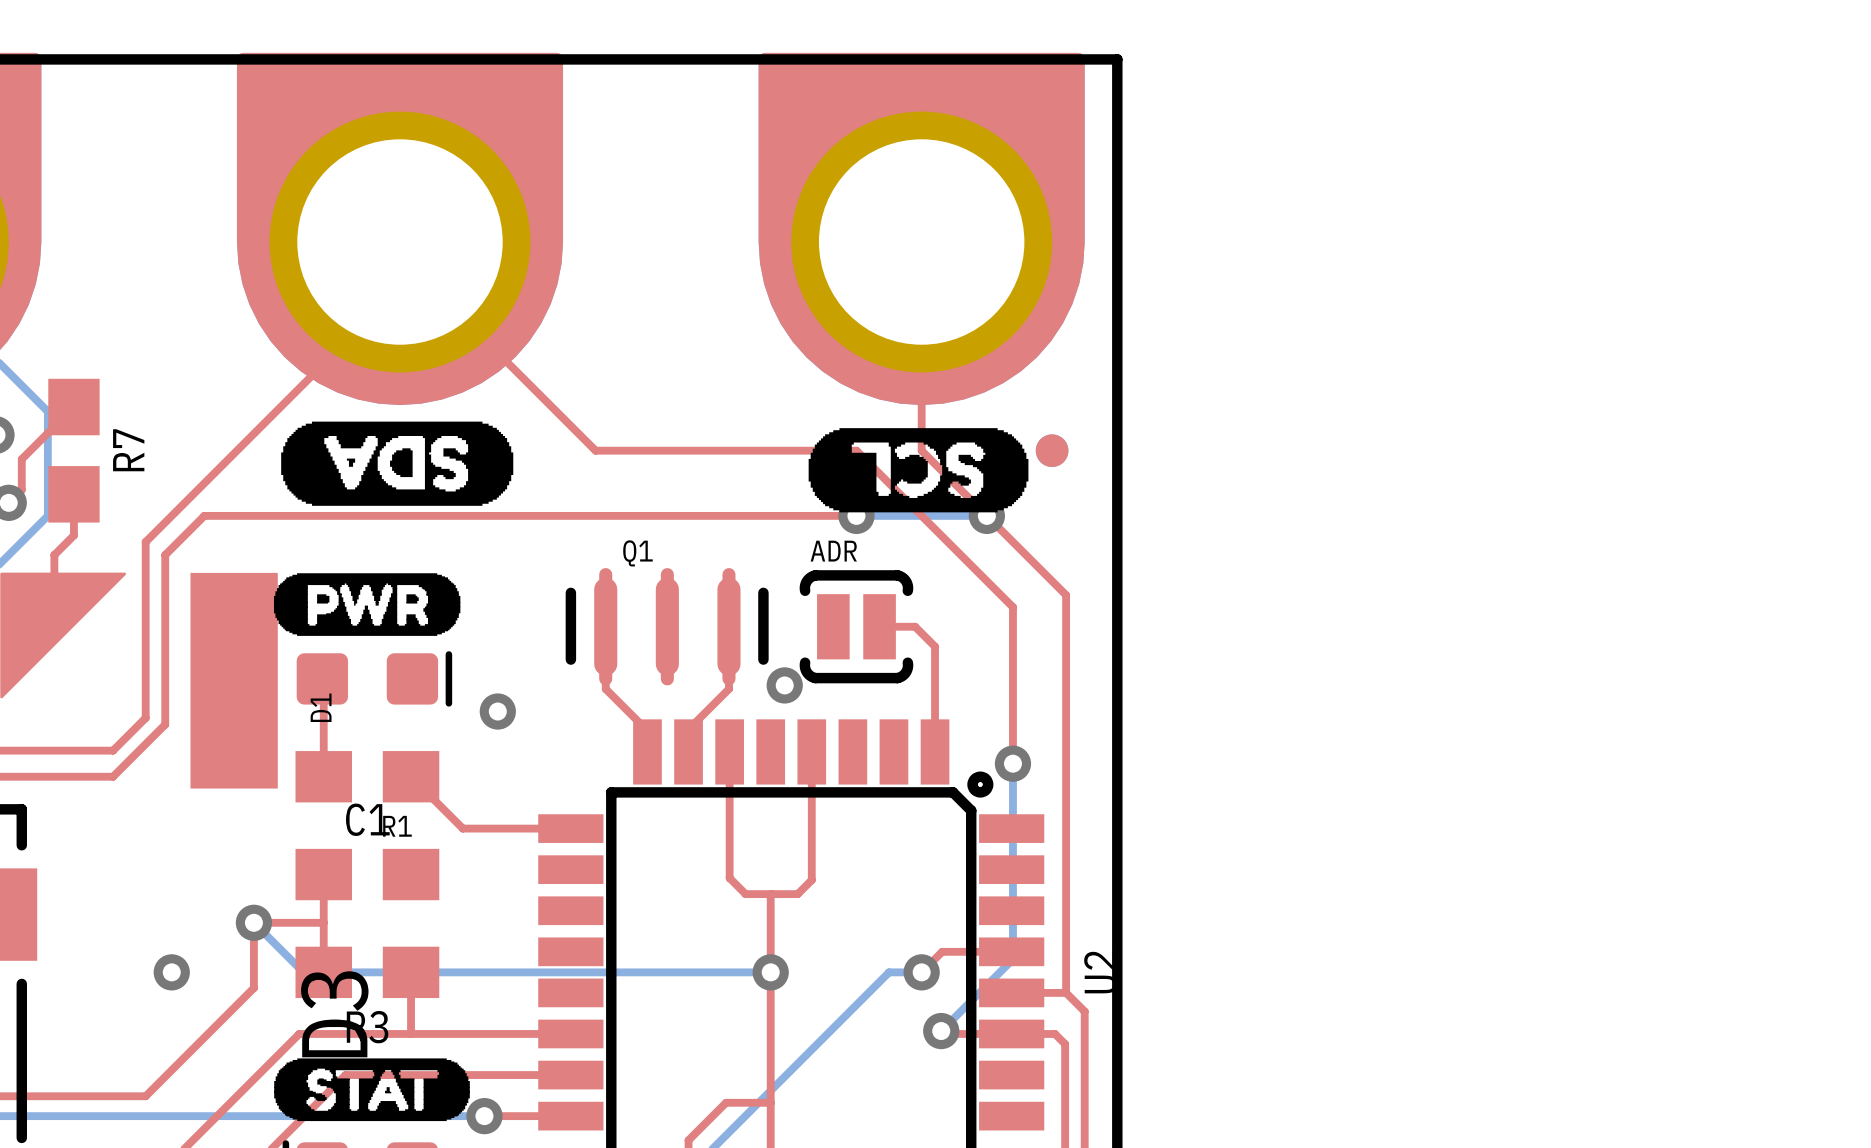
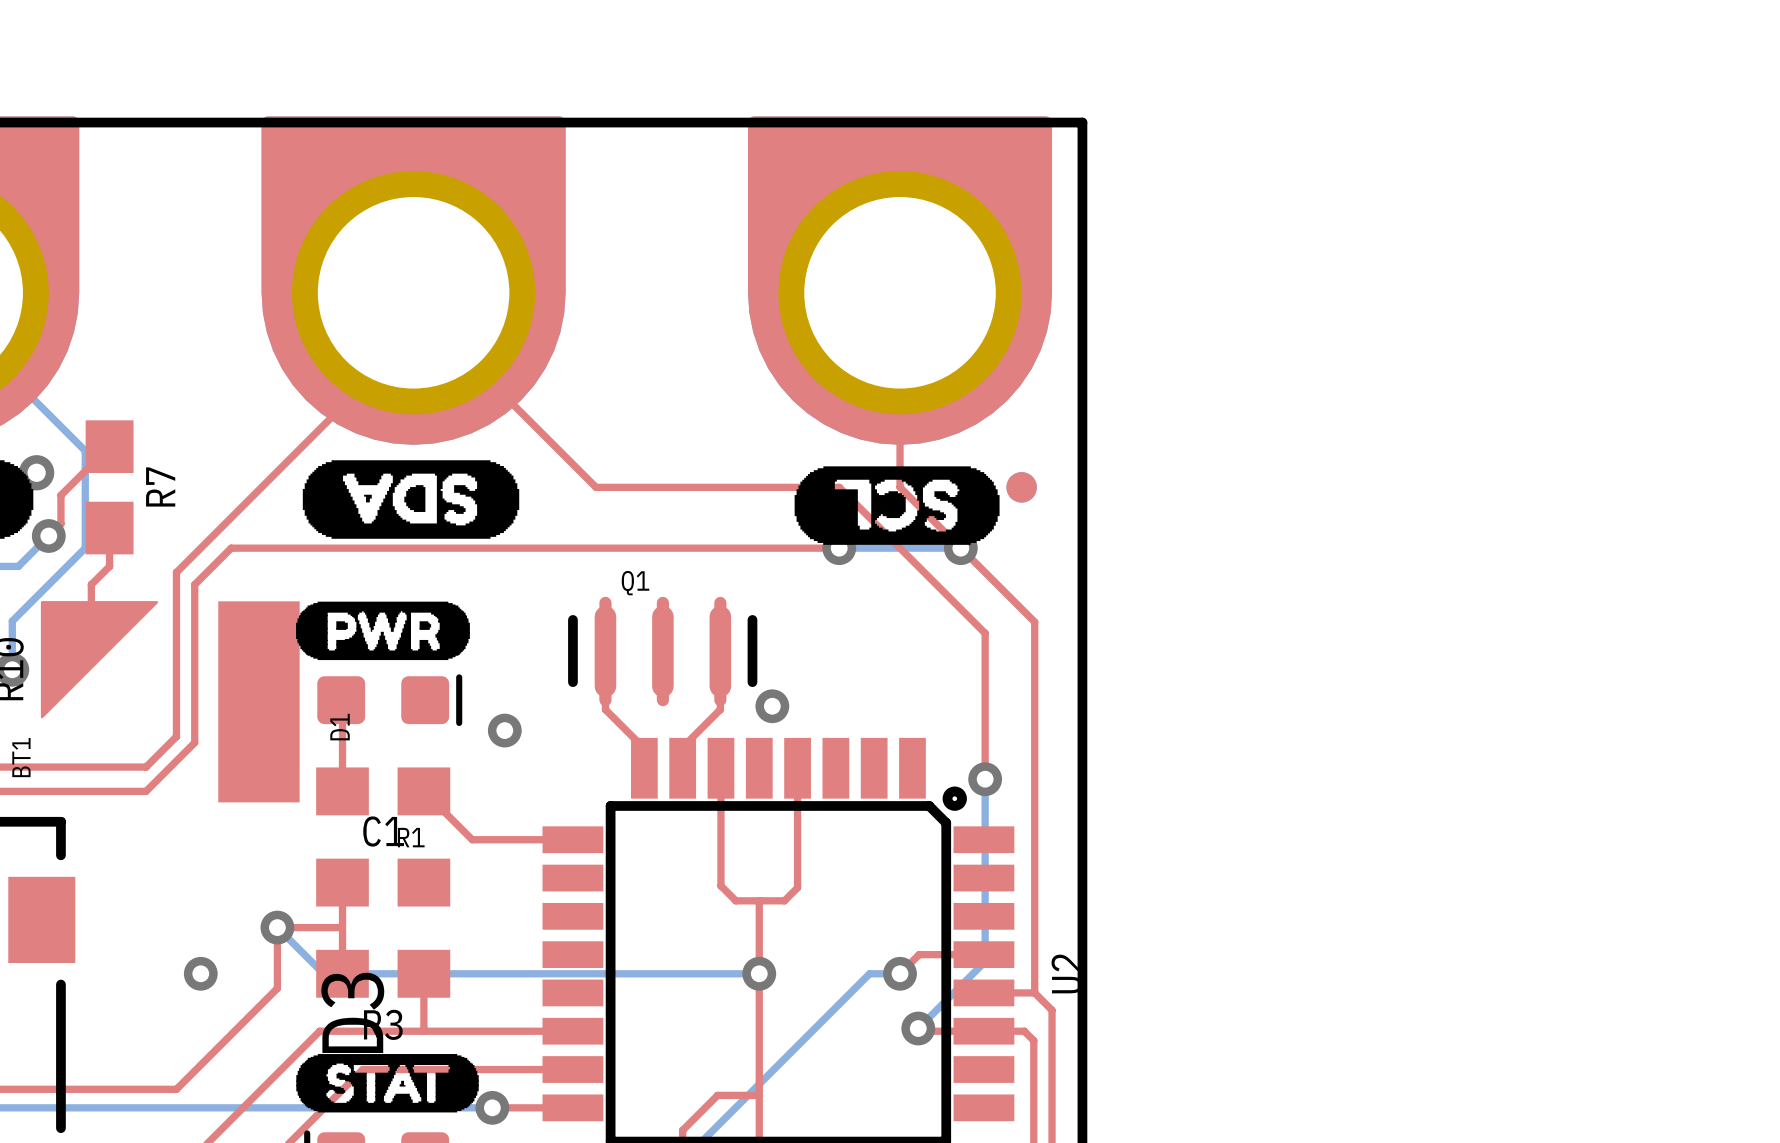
ADR: (856, 626) -> none
top track: (879, 626) (915, 626) (935, 646) (935, 751) -> none

